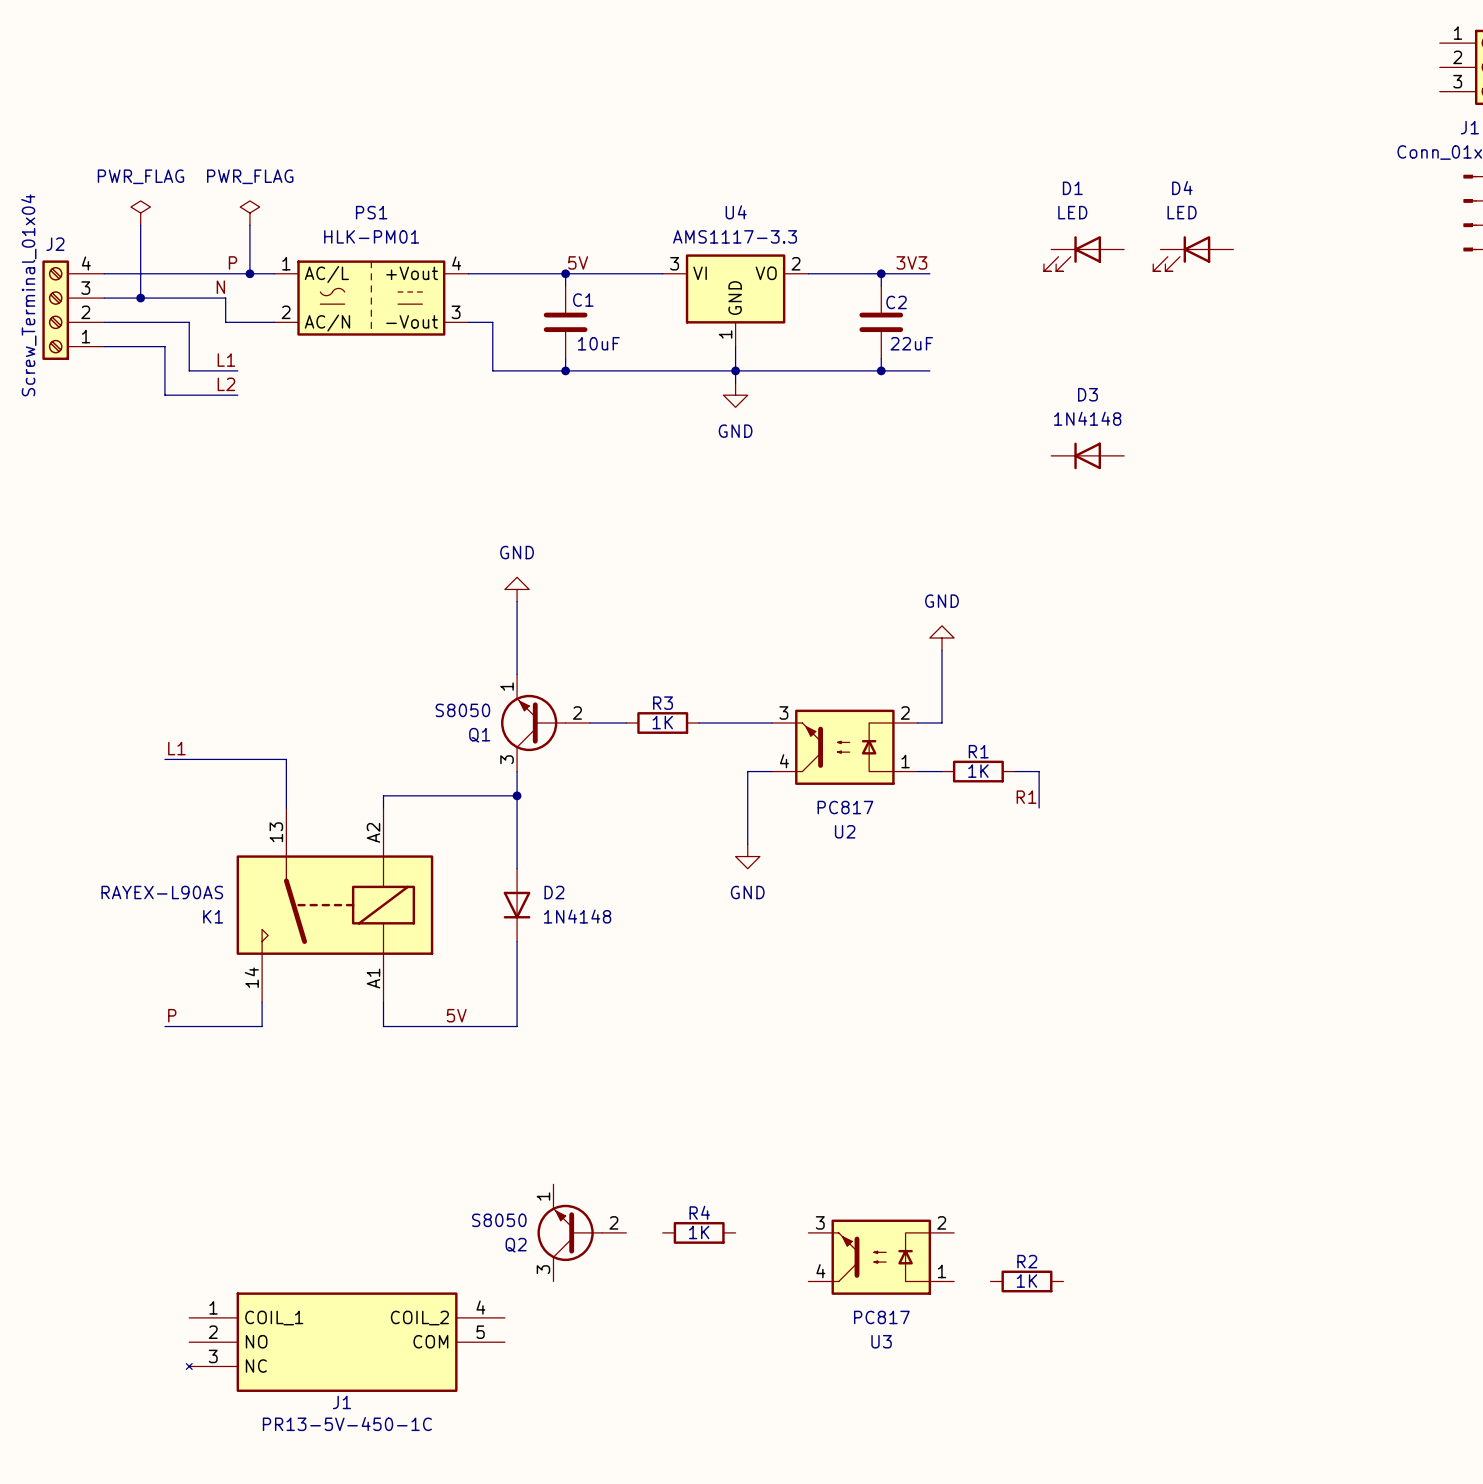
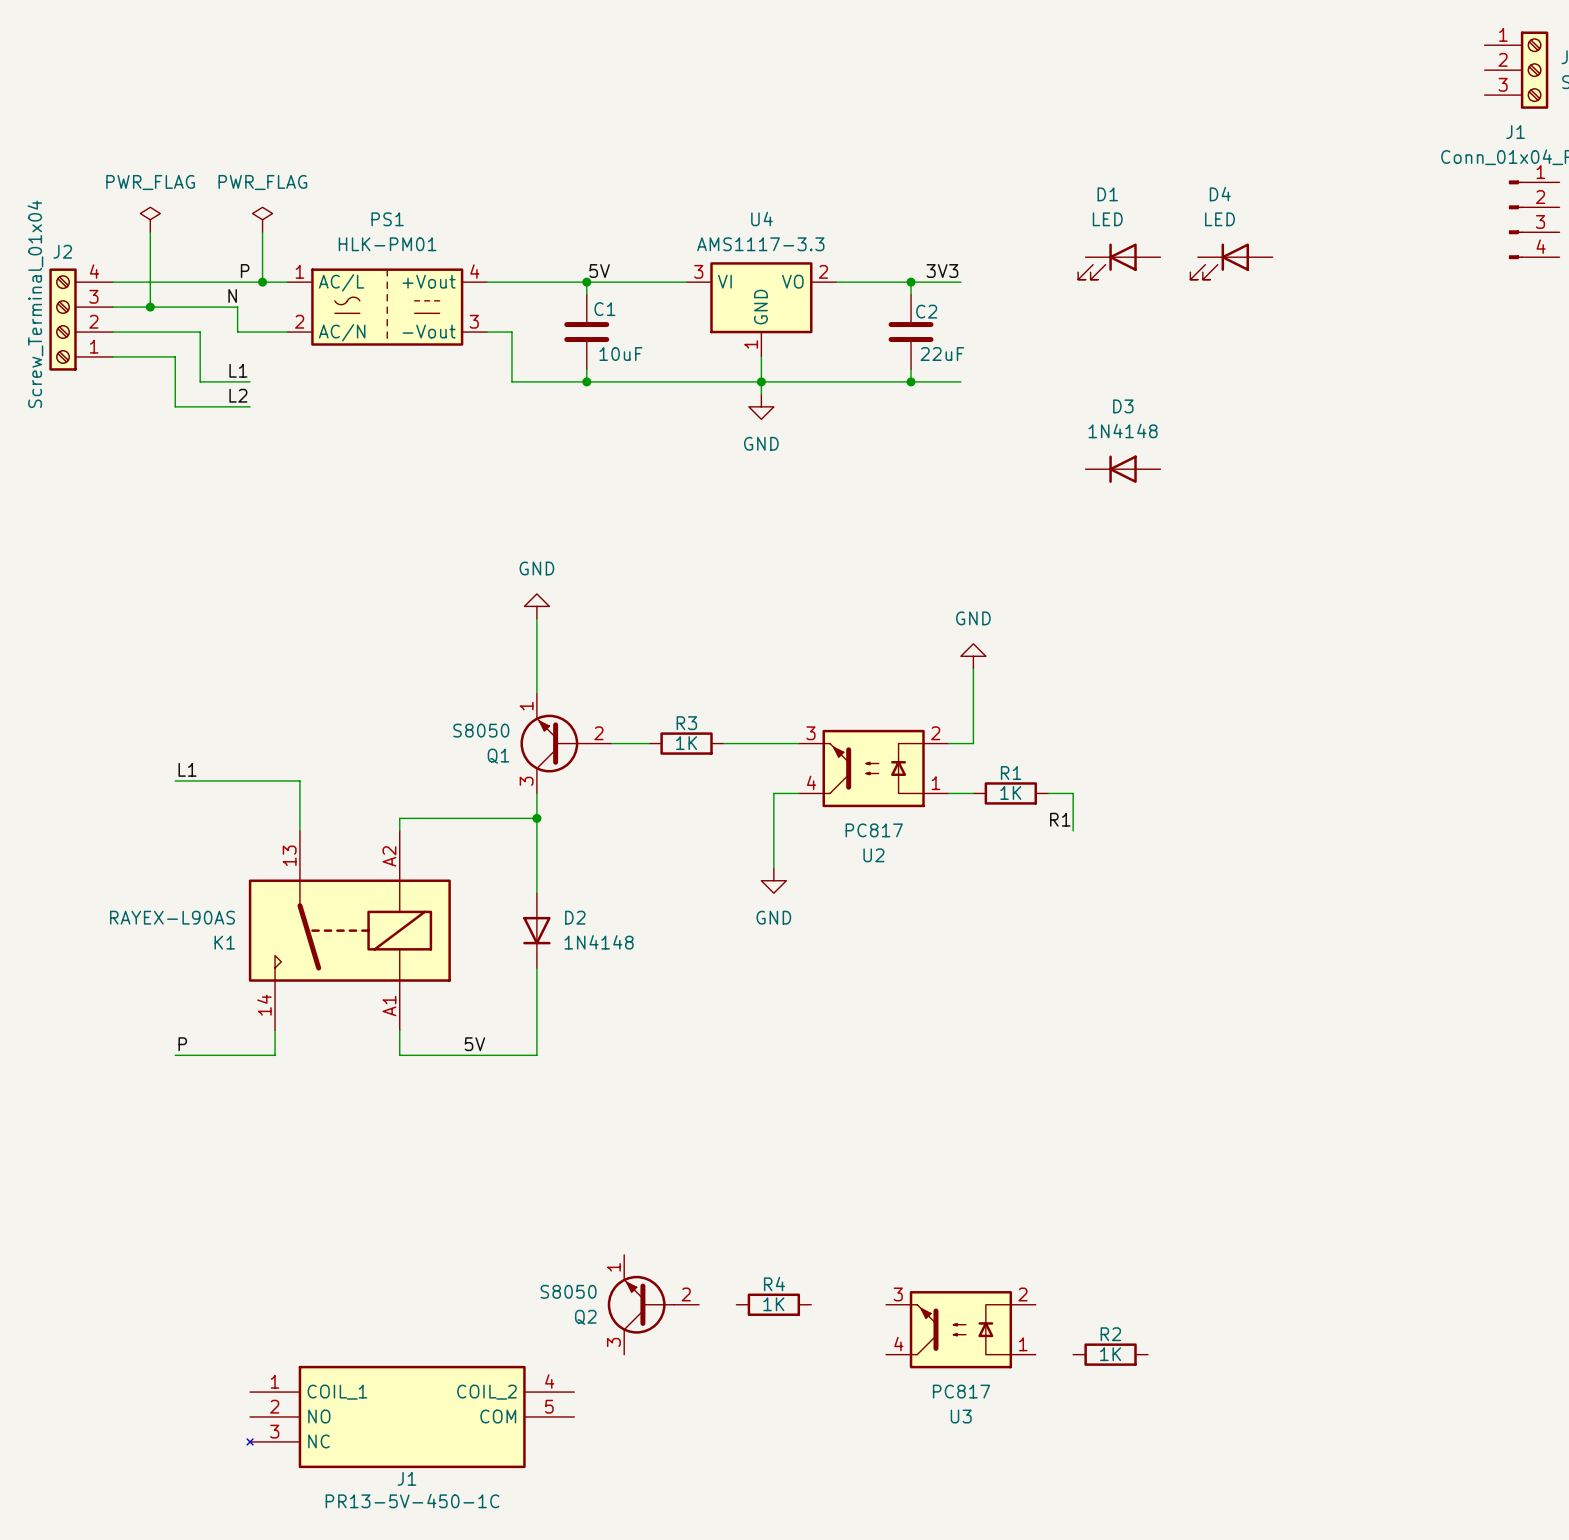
Q2 position: (581, 1232) -> (653, 1304)
R4 position: (699, 1232) -> (773, 1304)
U3 position: (881, 1257) -> (960, 1329)
R2 position: (1026, 1281) -> (1110, 1354)
J1 position: (345, 1342) -> (410, 1416)

